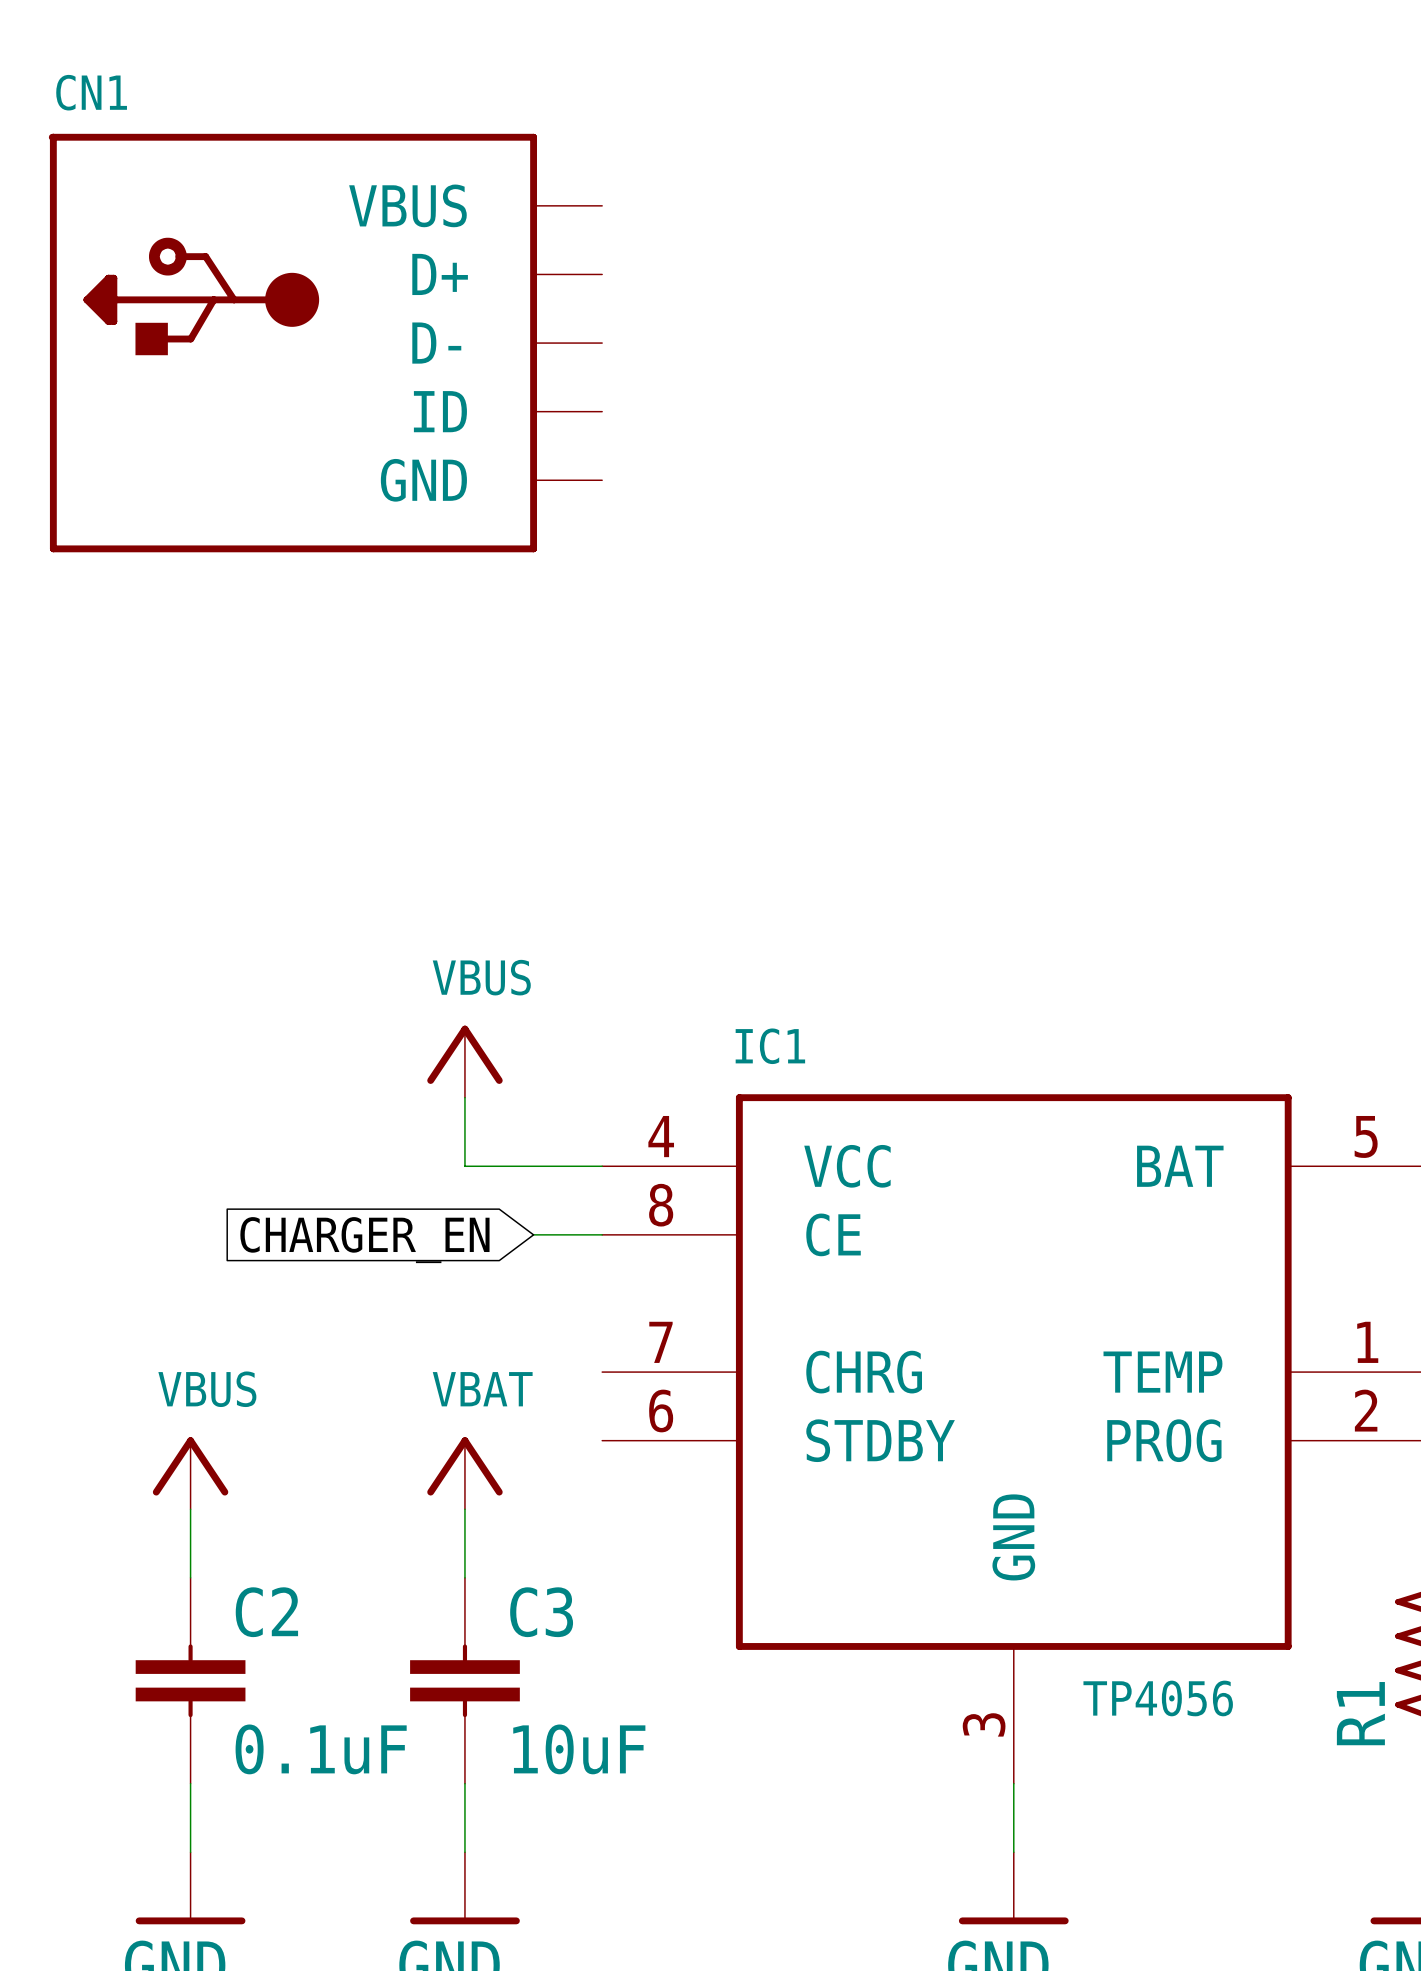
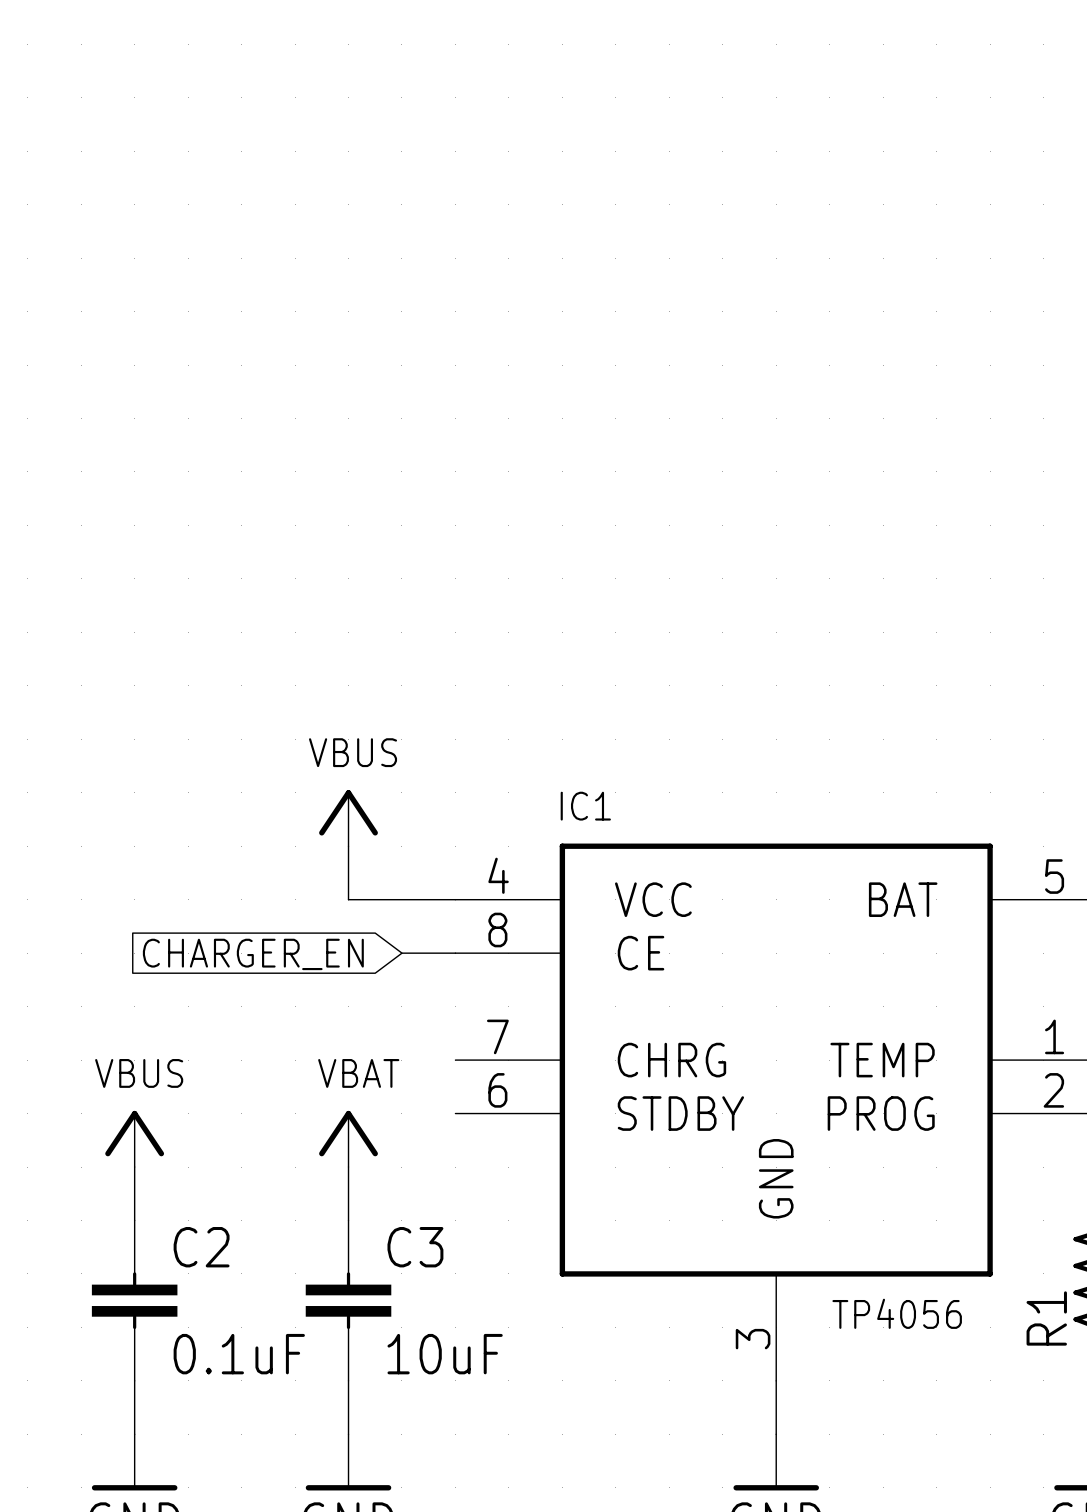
CN1: (325, 343) -> none

